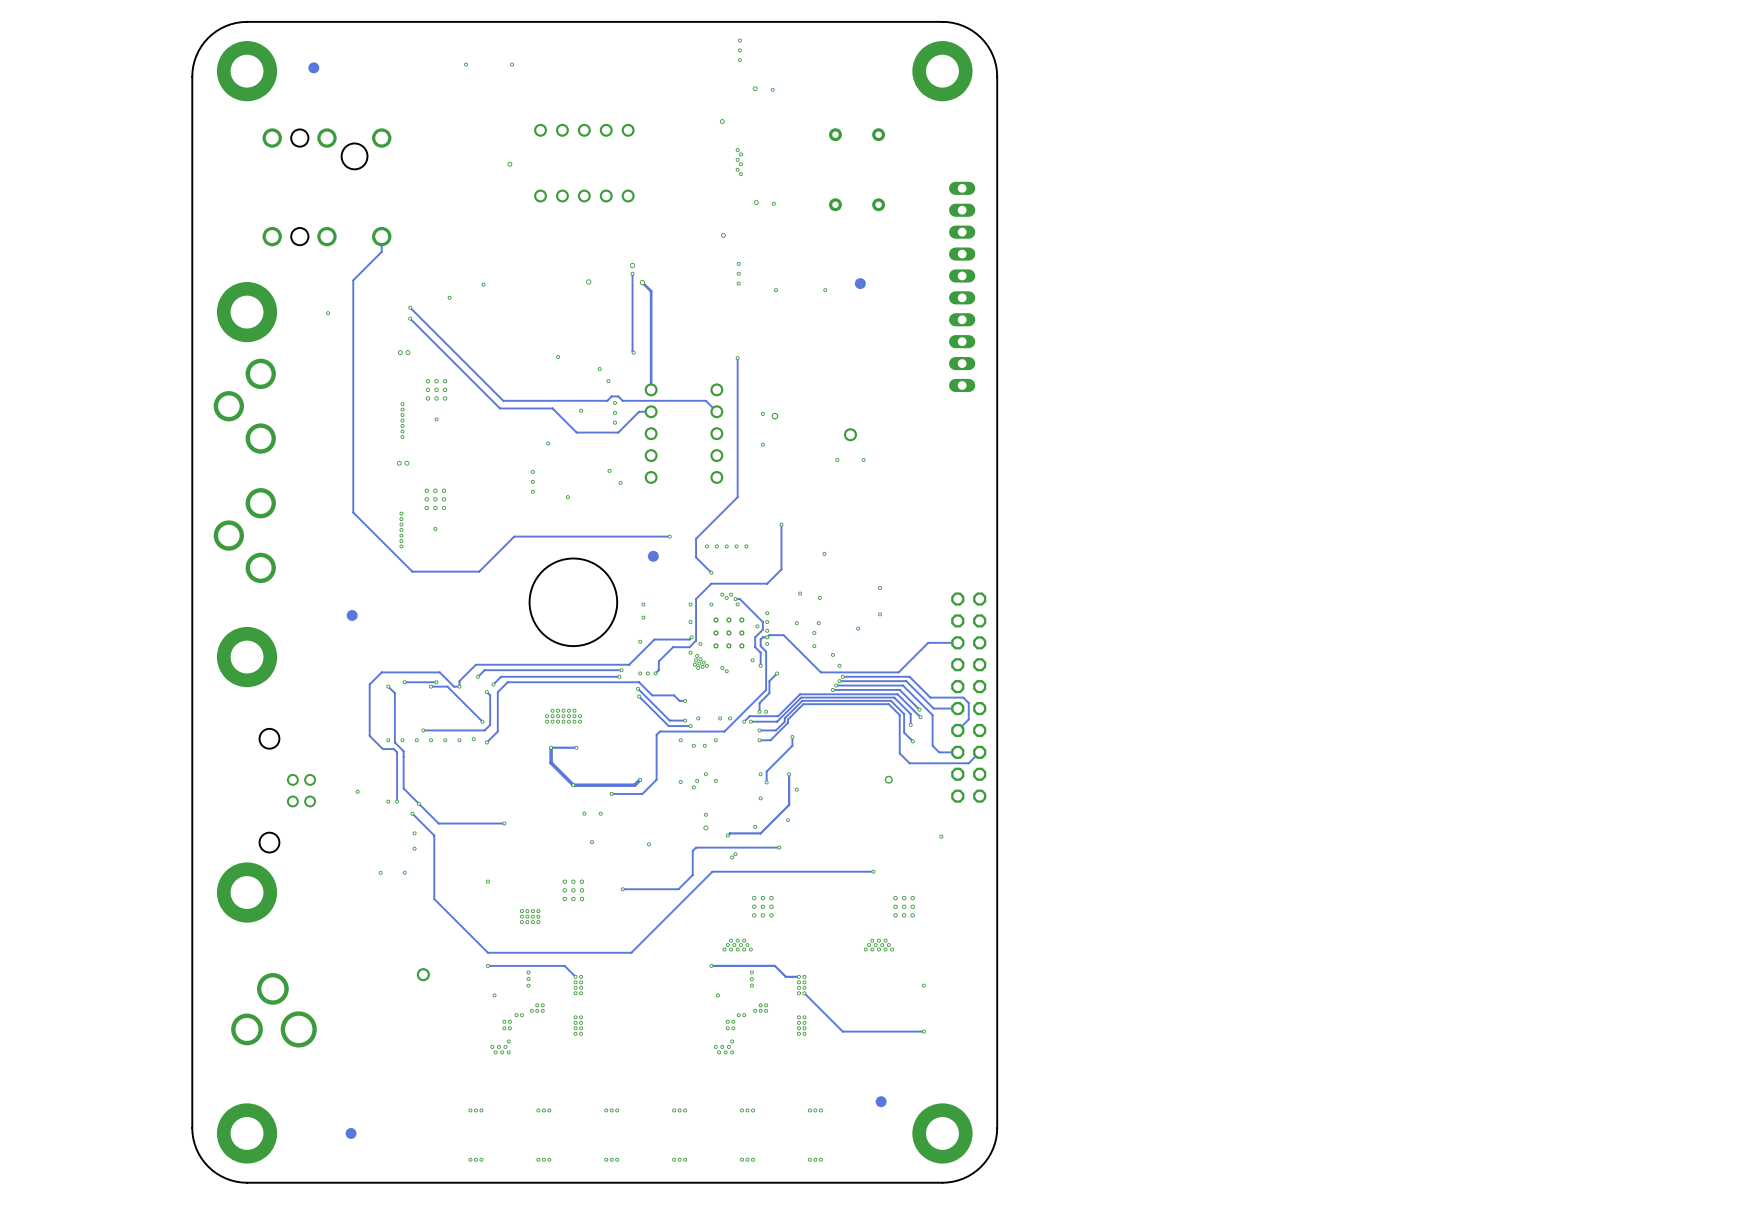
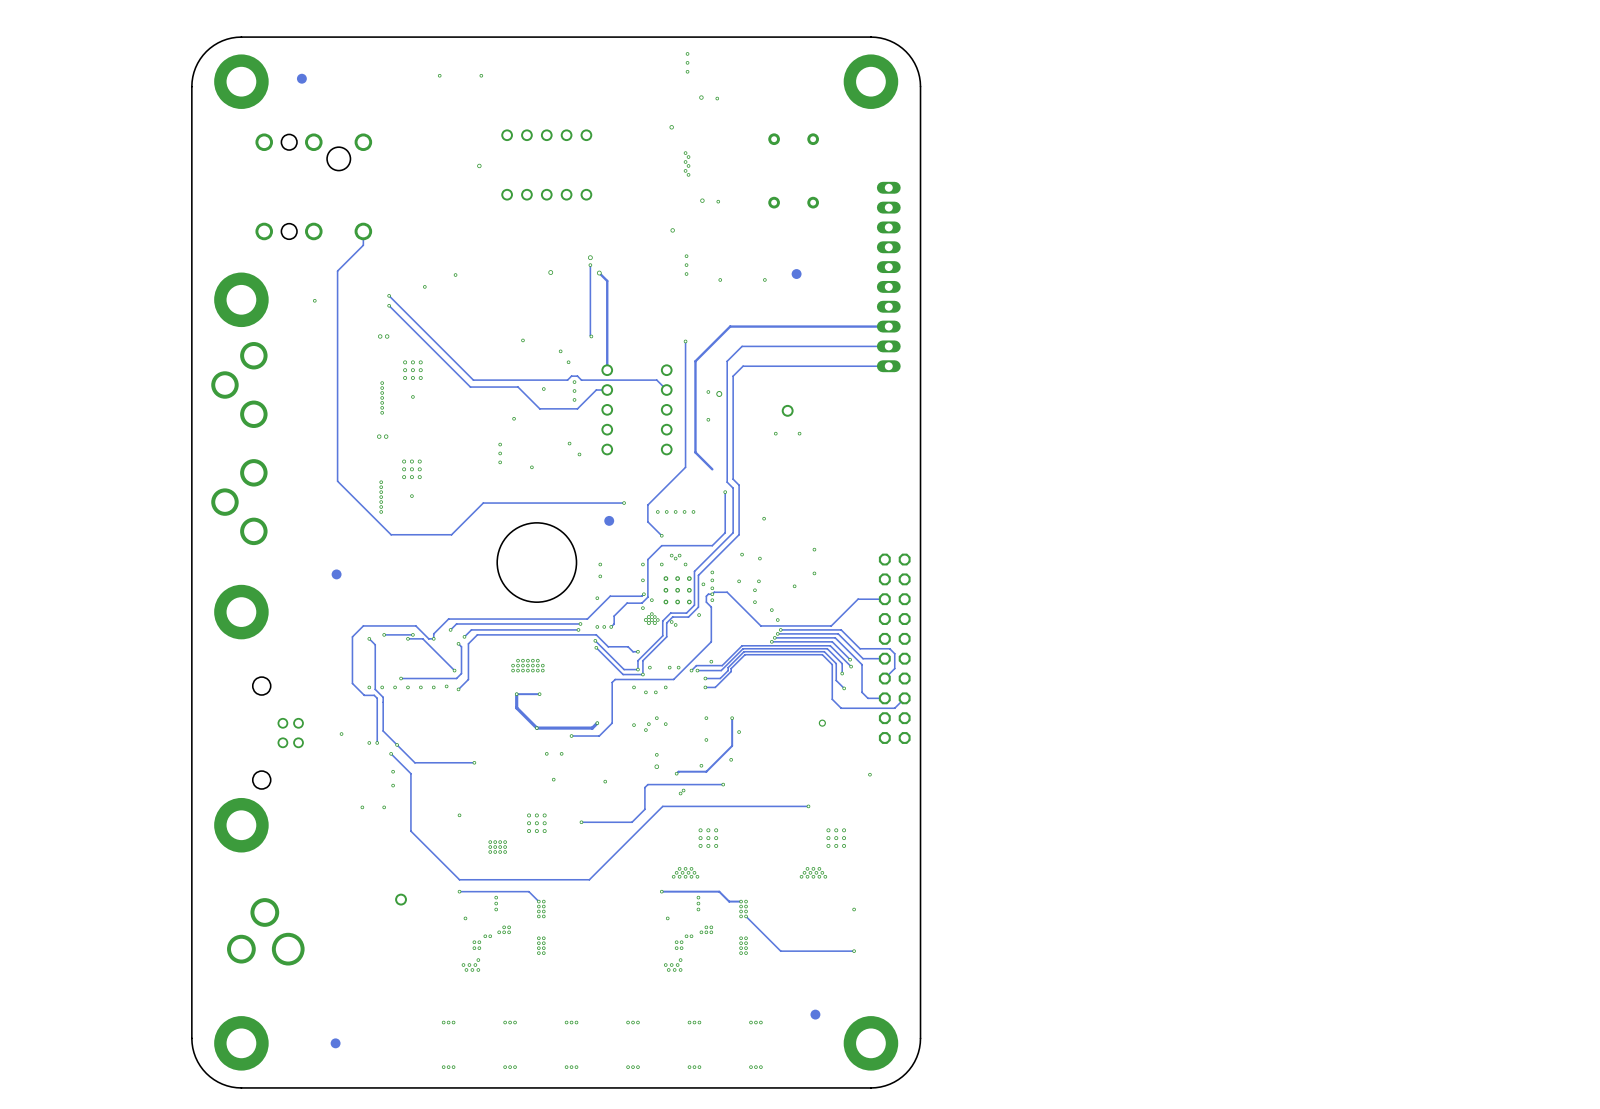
track: none -> (888, 326) (730, 326) (695, 361) (695, 452) (712, 469)
track: none -> (888, 346) (742, 346) (727, 361) (727, 482) (733, 488) (733, 532) (694, 571) (694, 605) (686, 613) (670, 613) (662, 621) (662, 635) (637, 660) (637, 669)
track: none -> (888, 366) (743, 366) (733, 376) (733, 479) (739, 485) (739, 534) (698, 575) (698, 607) (688, 617) (672, 617) (666, 622) (666, 636) (642, 660) (643, 674)
track: (735, 599) (739, 599) (762, 622) (762, 629) (755, 637) (755, 647) (760, 652) (760, 665) -> none
via: (735, 599) -> none
via: (697, 655) -> none
via: (696, 660) -> none
via: none -> (648, 617)
via: (699, 663) -> none
via: (694, 664) -> none
via: none -> (645, 620)
via: none -> (651, 620)
via: (760, 665) -> none
via: (702, 666) -> none
via: (698, 668) -> none
via: none -> (648, 622)
via: none -> (654, 622)
track: (777, 673) (769, 681) (769, 693) (759, 703) (759, 711) -> none
via: (777, 673) -> none
via: (759, 711) -> none
track: (792, 737) (792, 745) (766, 771) (766, 782) -> none
via: (792, 737) -> none
via: (766, 782) -> none

